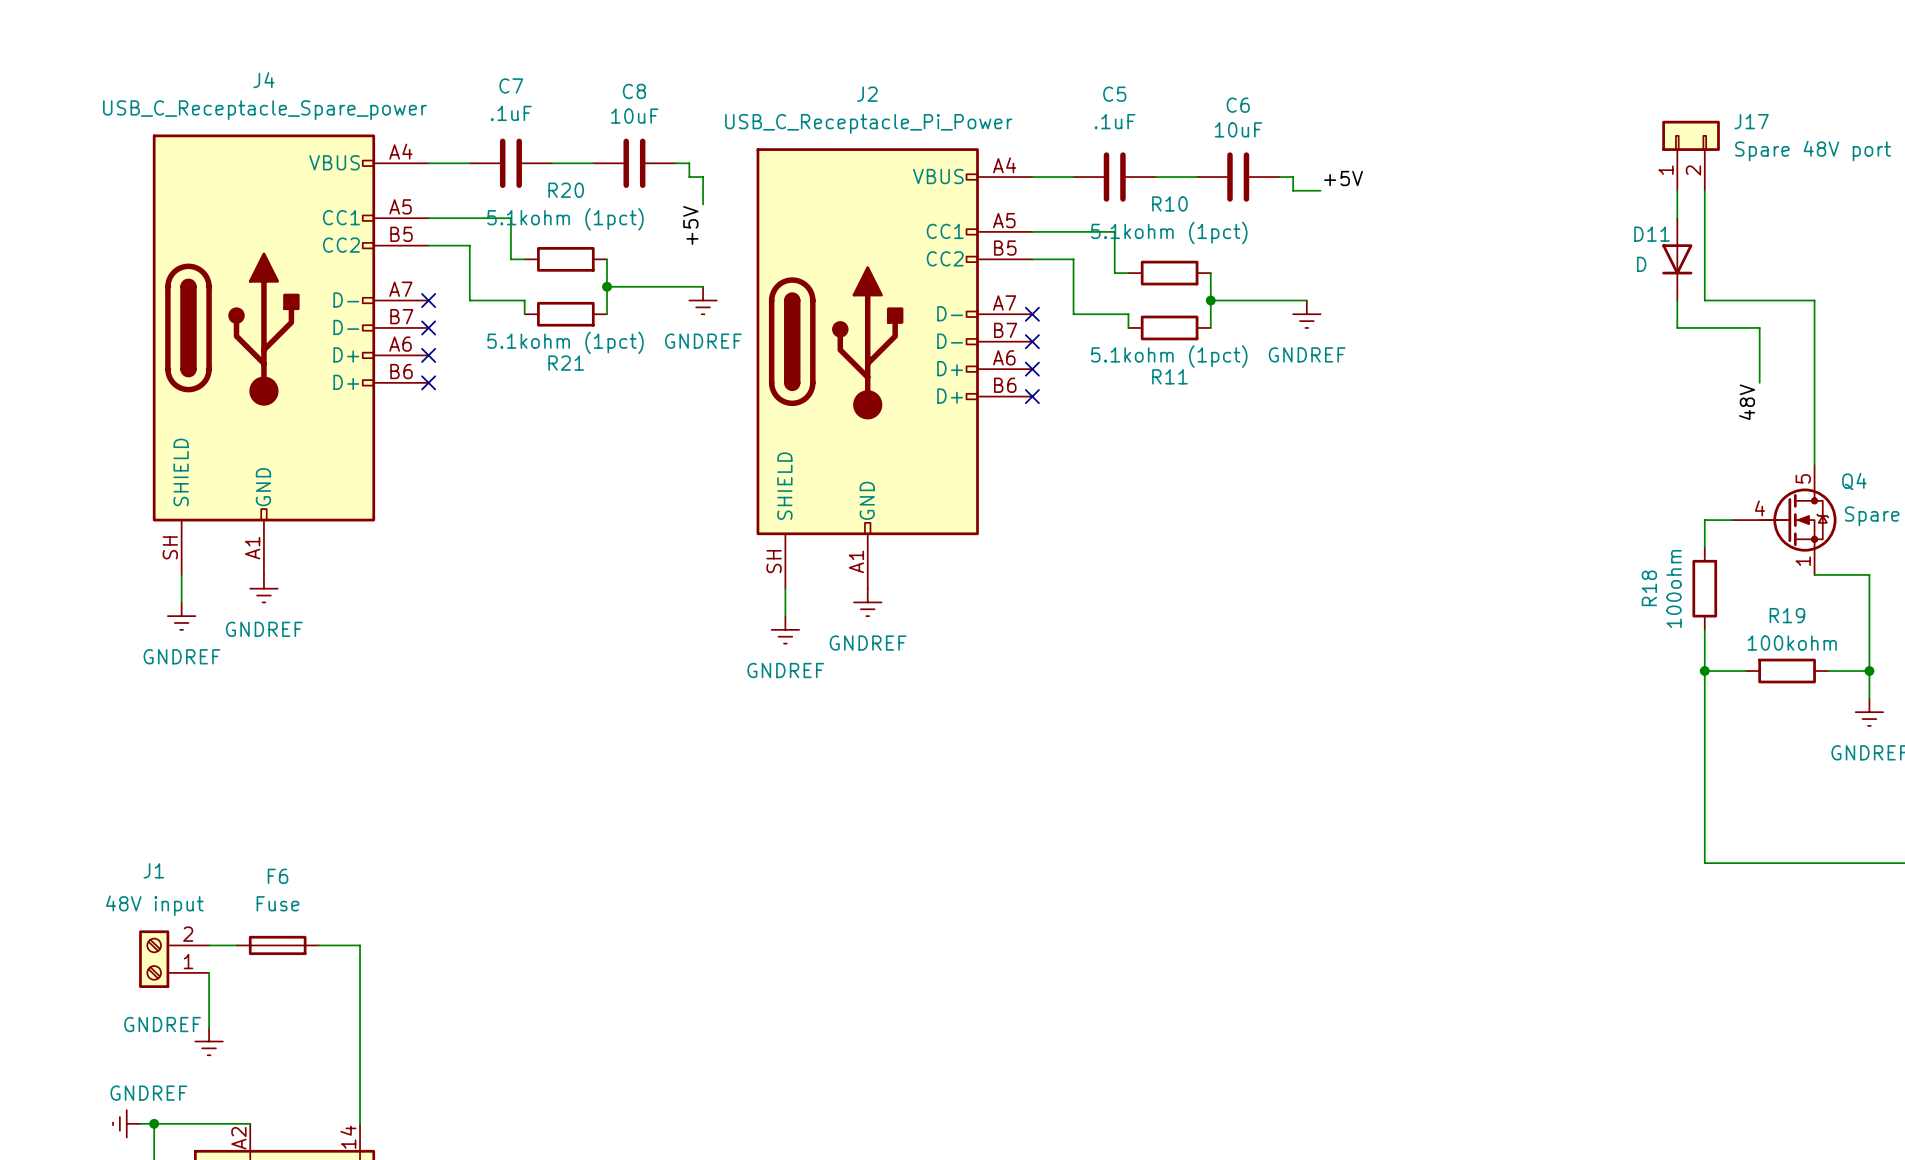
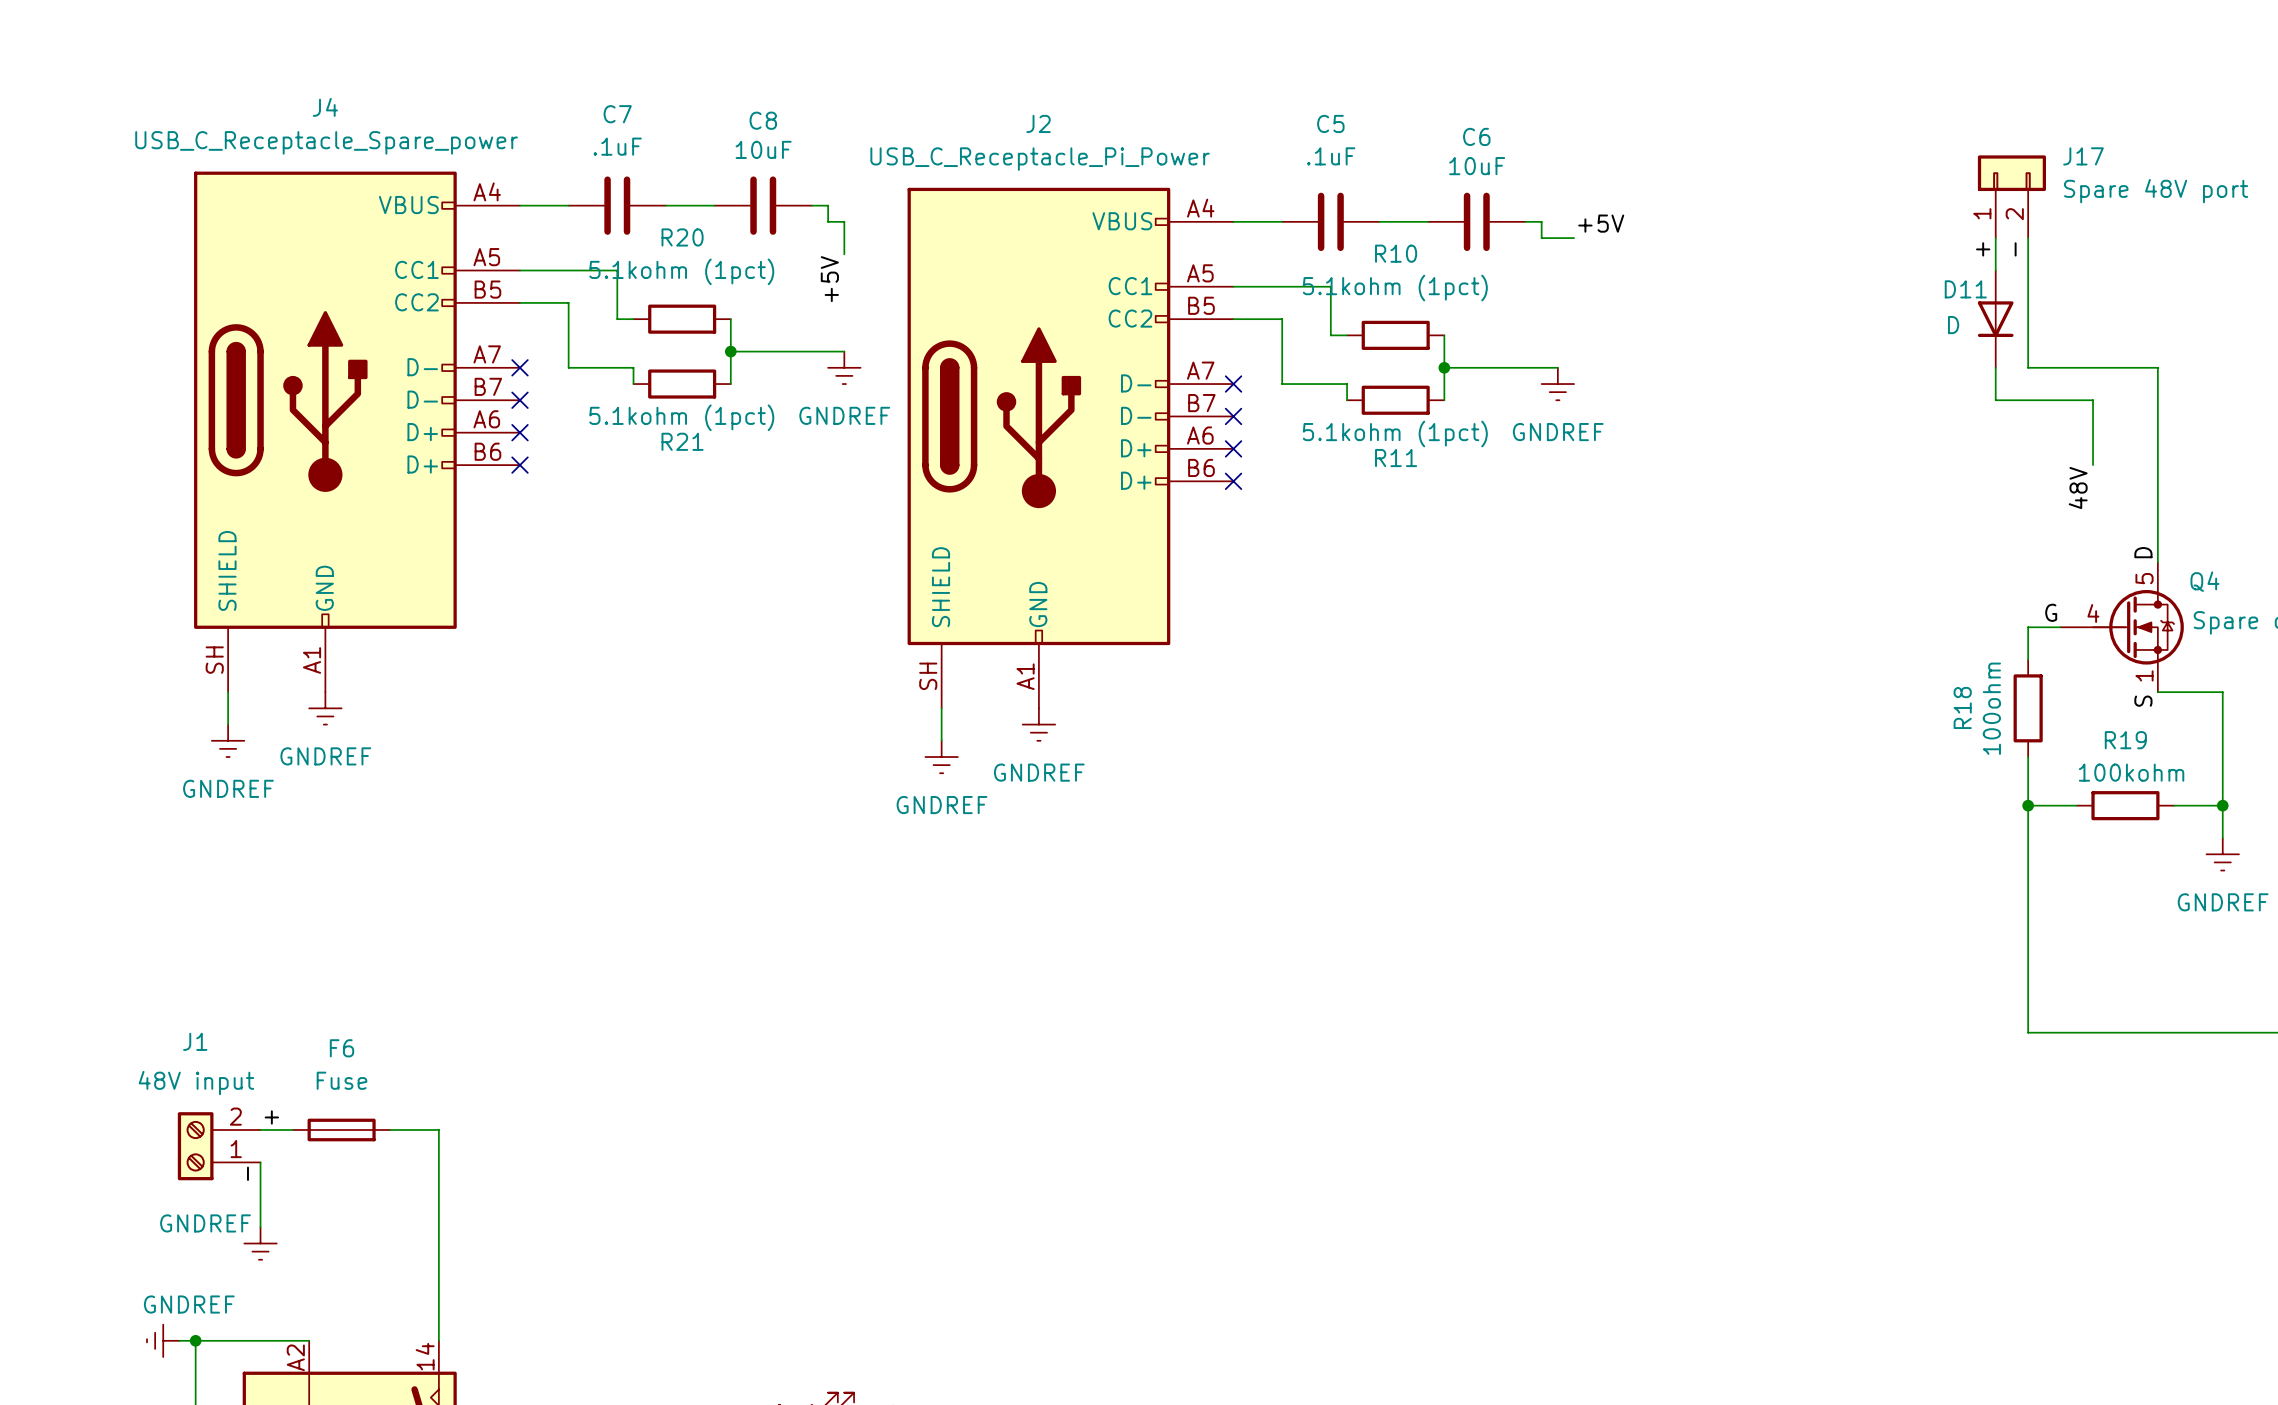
label: none -> + (1983, 249)
label: none -> - (2015, 249)
label: none -> D (2143, 552)
label: none -> G (2051, 612)
label: none -> S (2143, 701)
label: none -> + (271, 1117)
label: none -> - (247, 1173)

